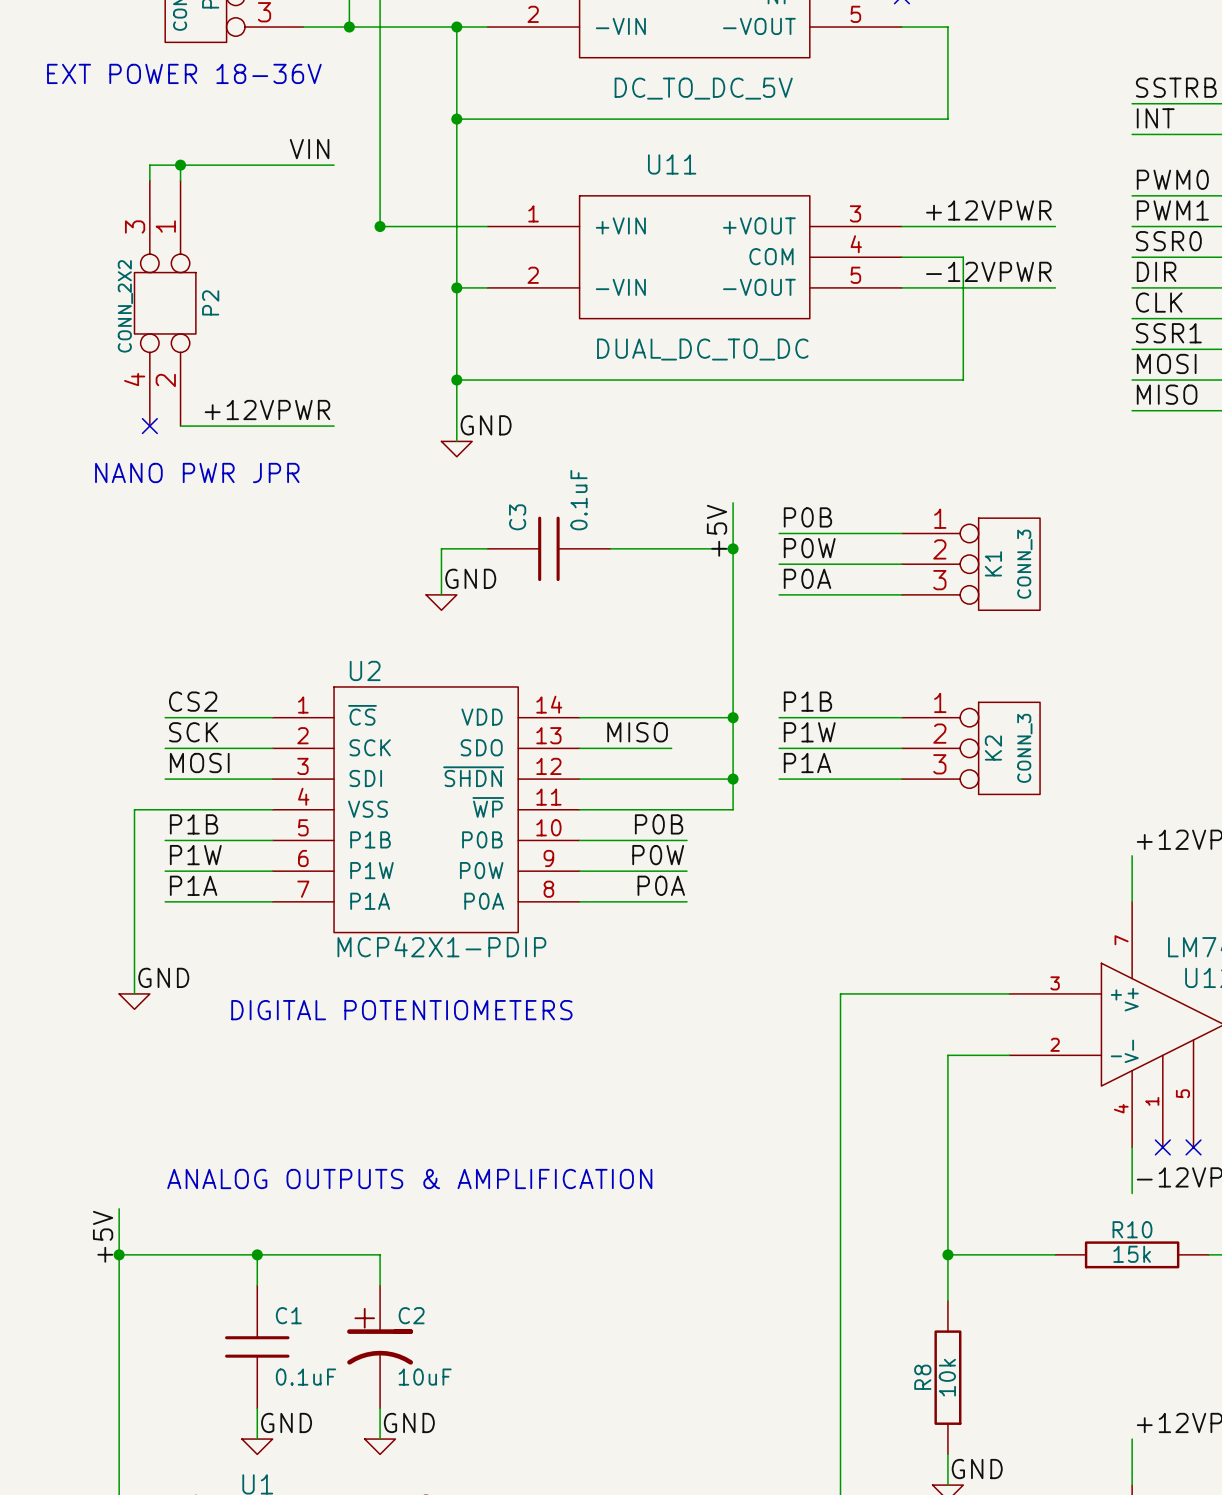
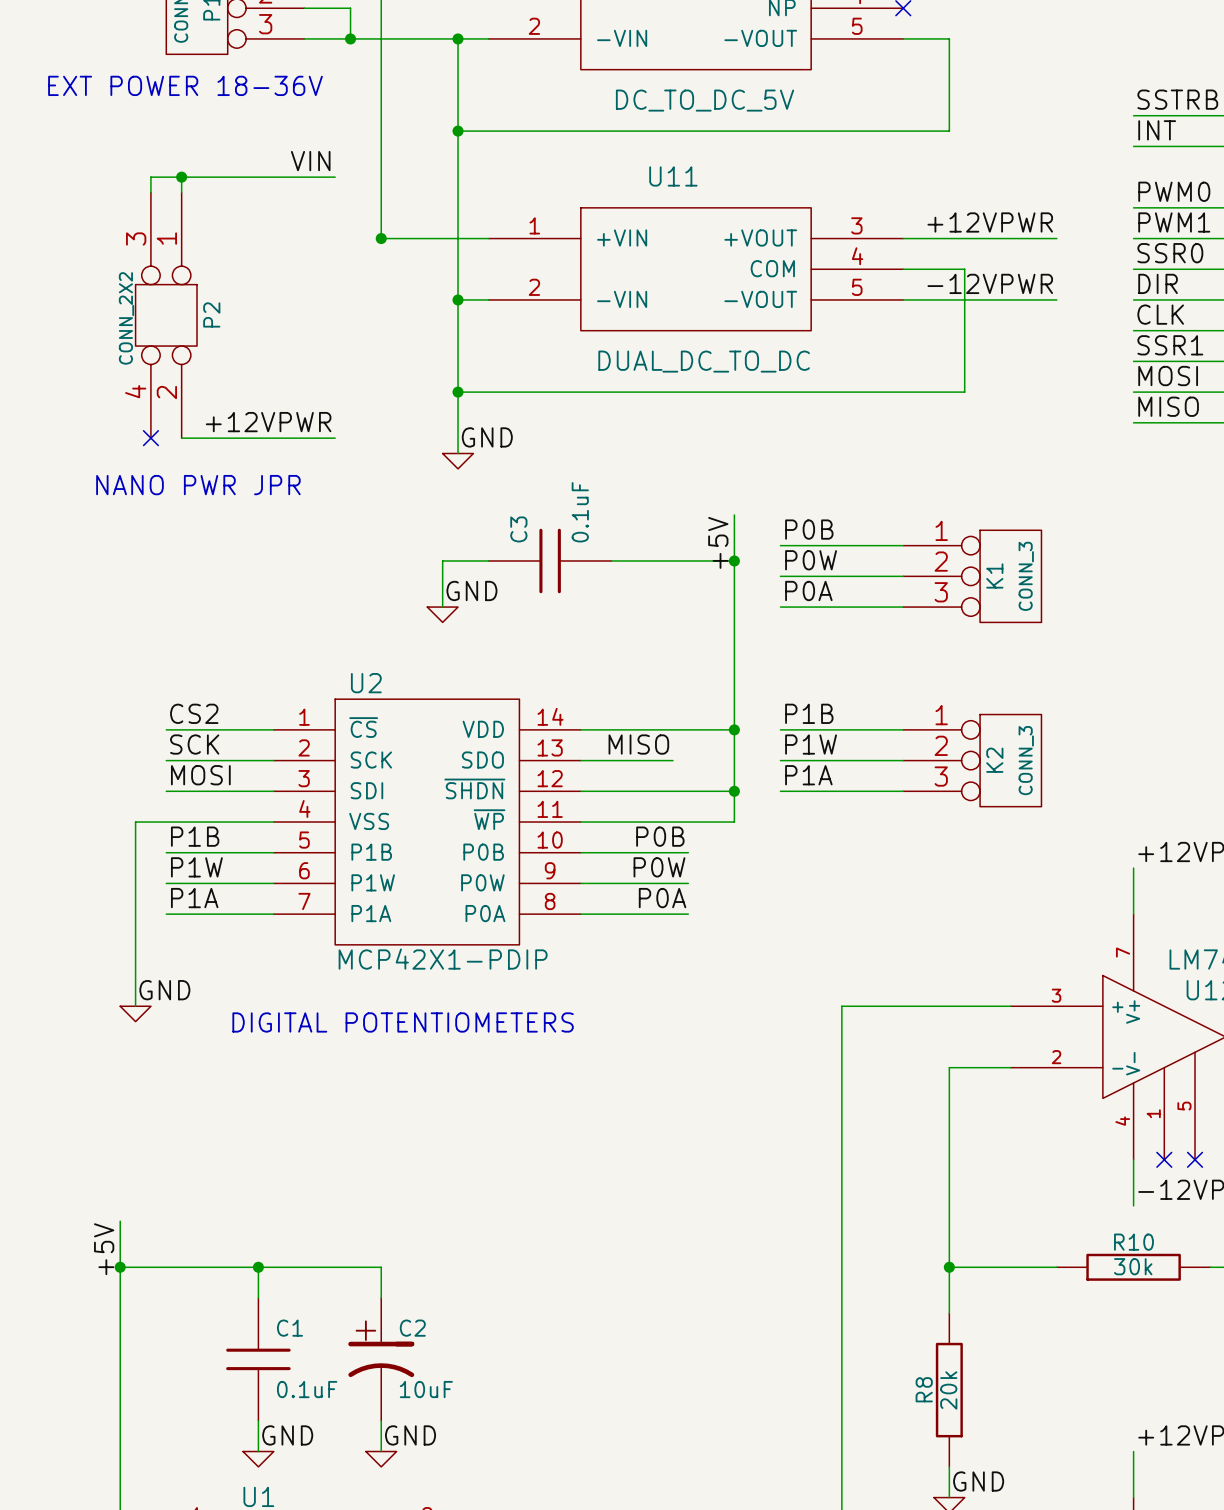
text: ANALOG OUTPUTS & AMPLIFICATION (409, 1178) -> none
R10 value: 15k (1132, 1254) -> 30k (1133, 1266)
R8 value: 10k (947, 1377) -> 20k (948, 1390)

